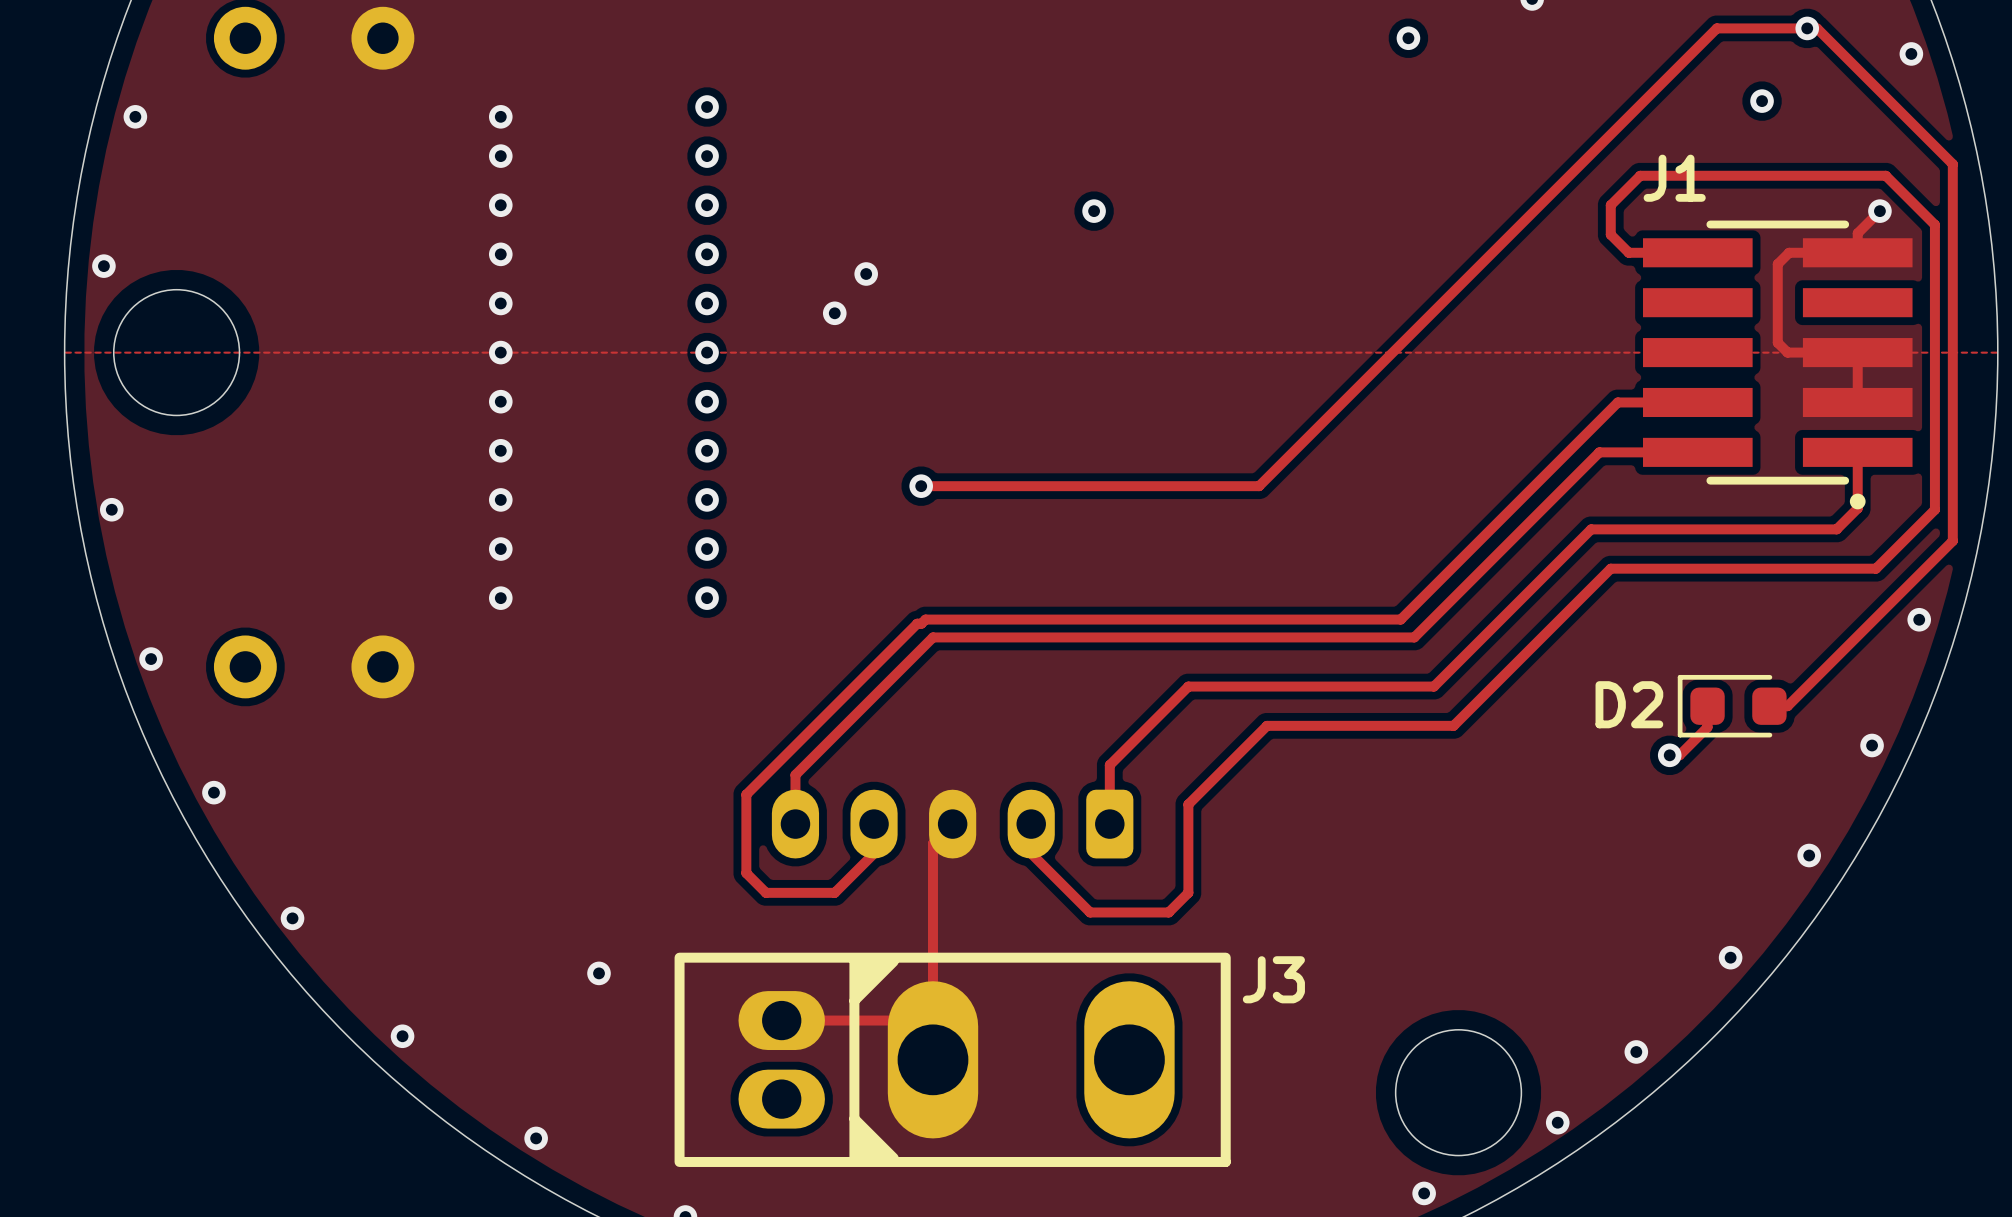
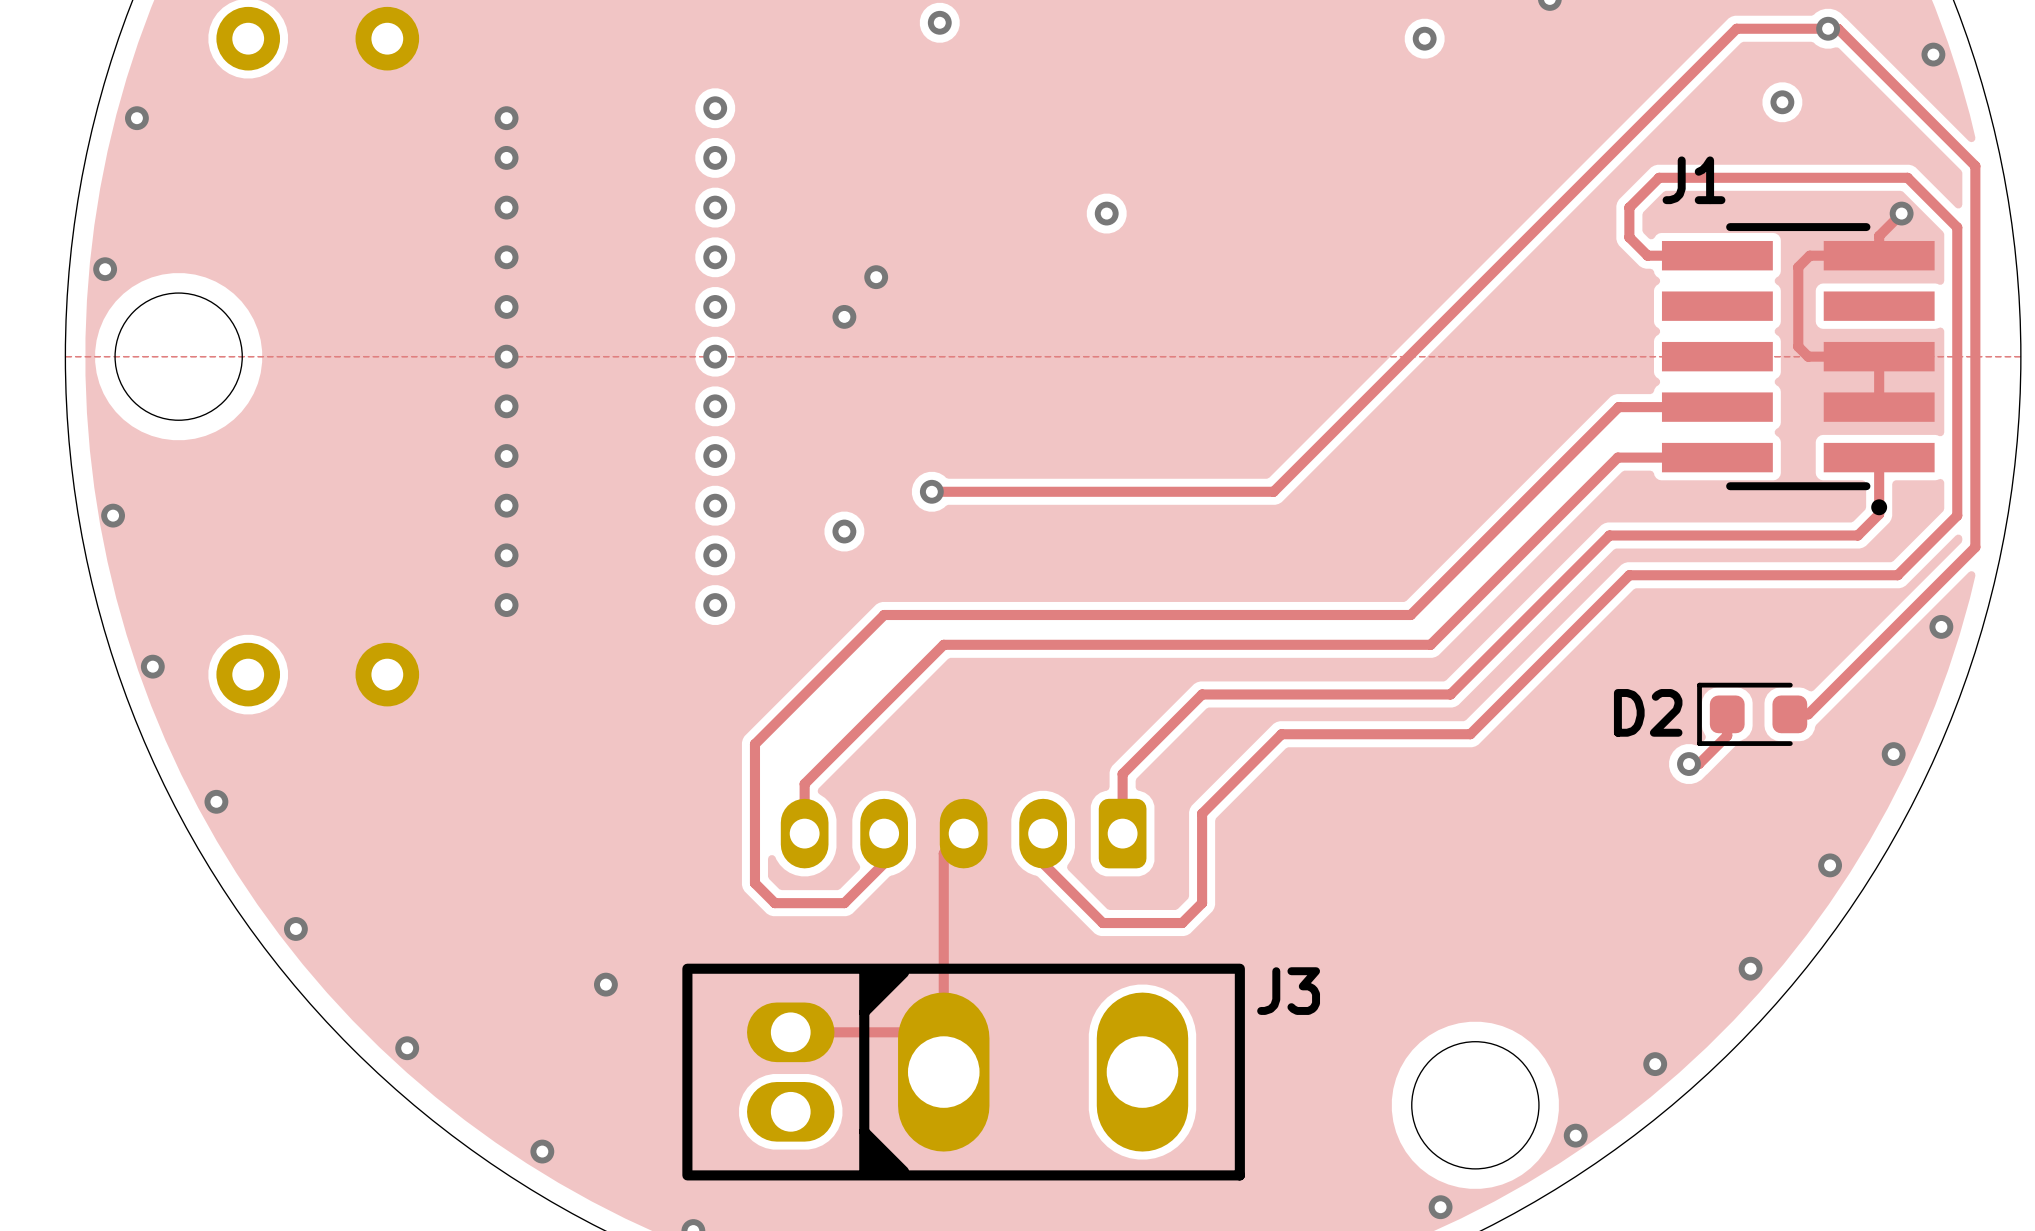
via: none -> (939, 22)
track: (1617, 402) (1400, 619) (925, 619) (921, 623) (917, 623) (746, 794) -> (1636, 407) (1618, 407) (1410, 614) (884, 614) (754, 744) (754, 803)
via: none -> (844, 531)

